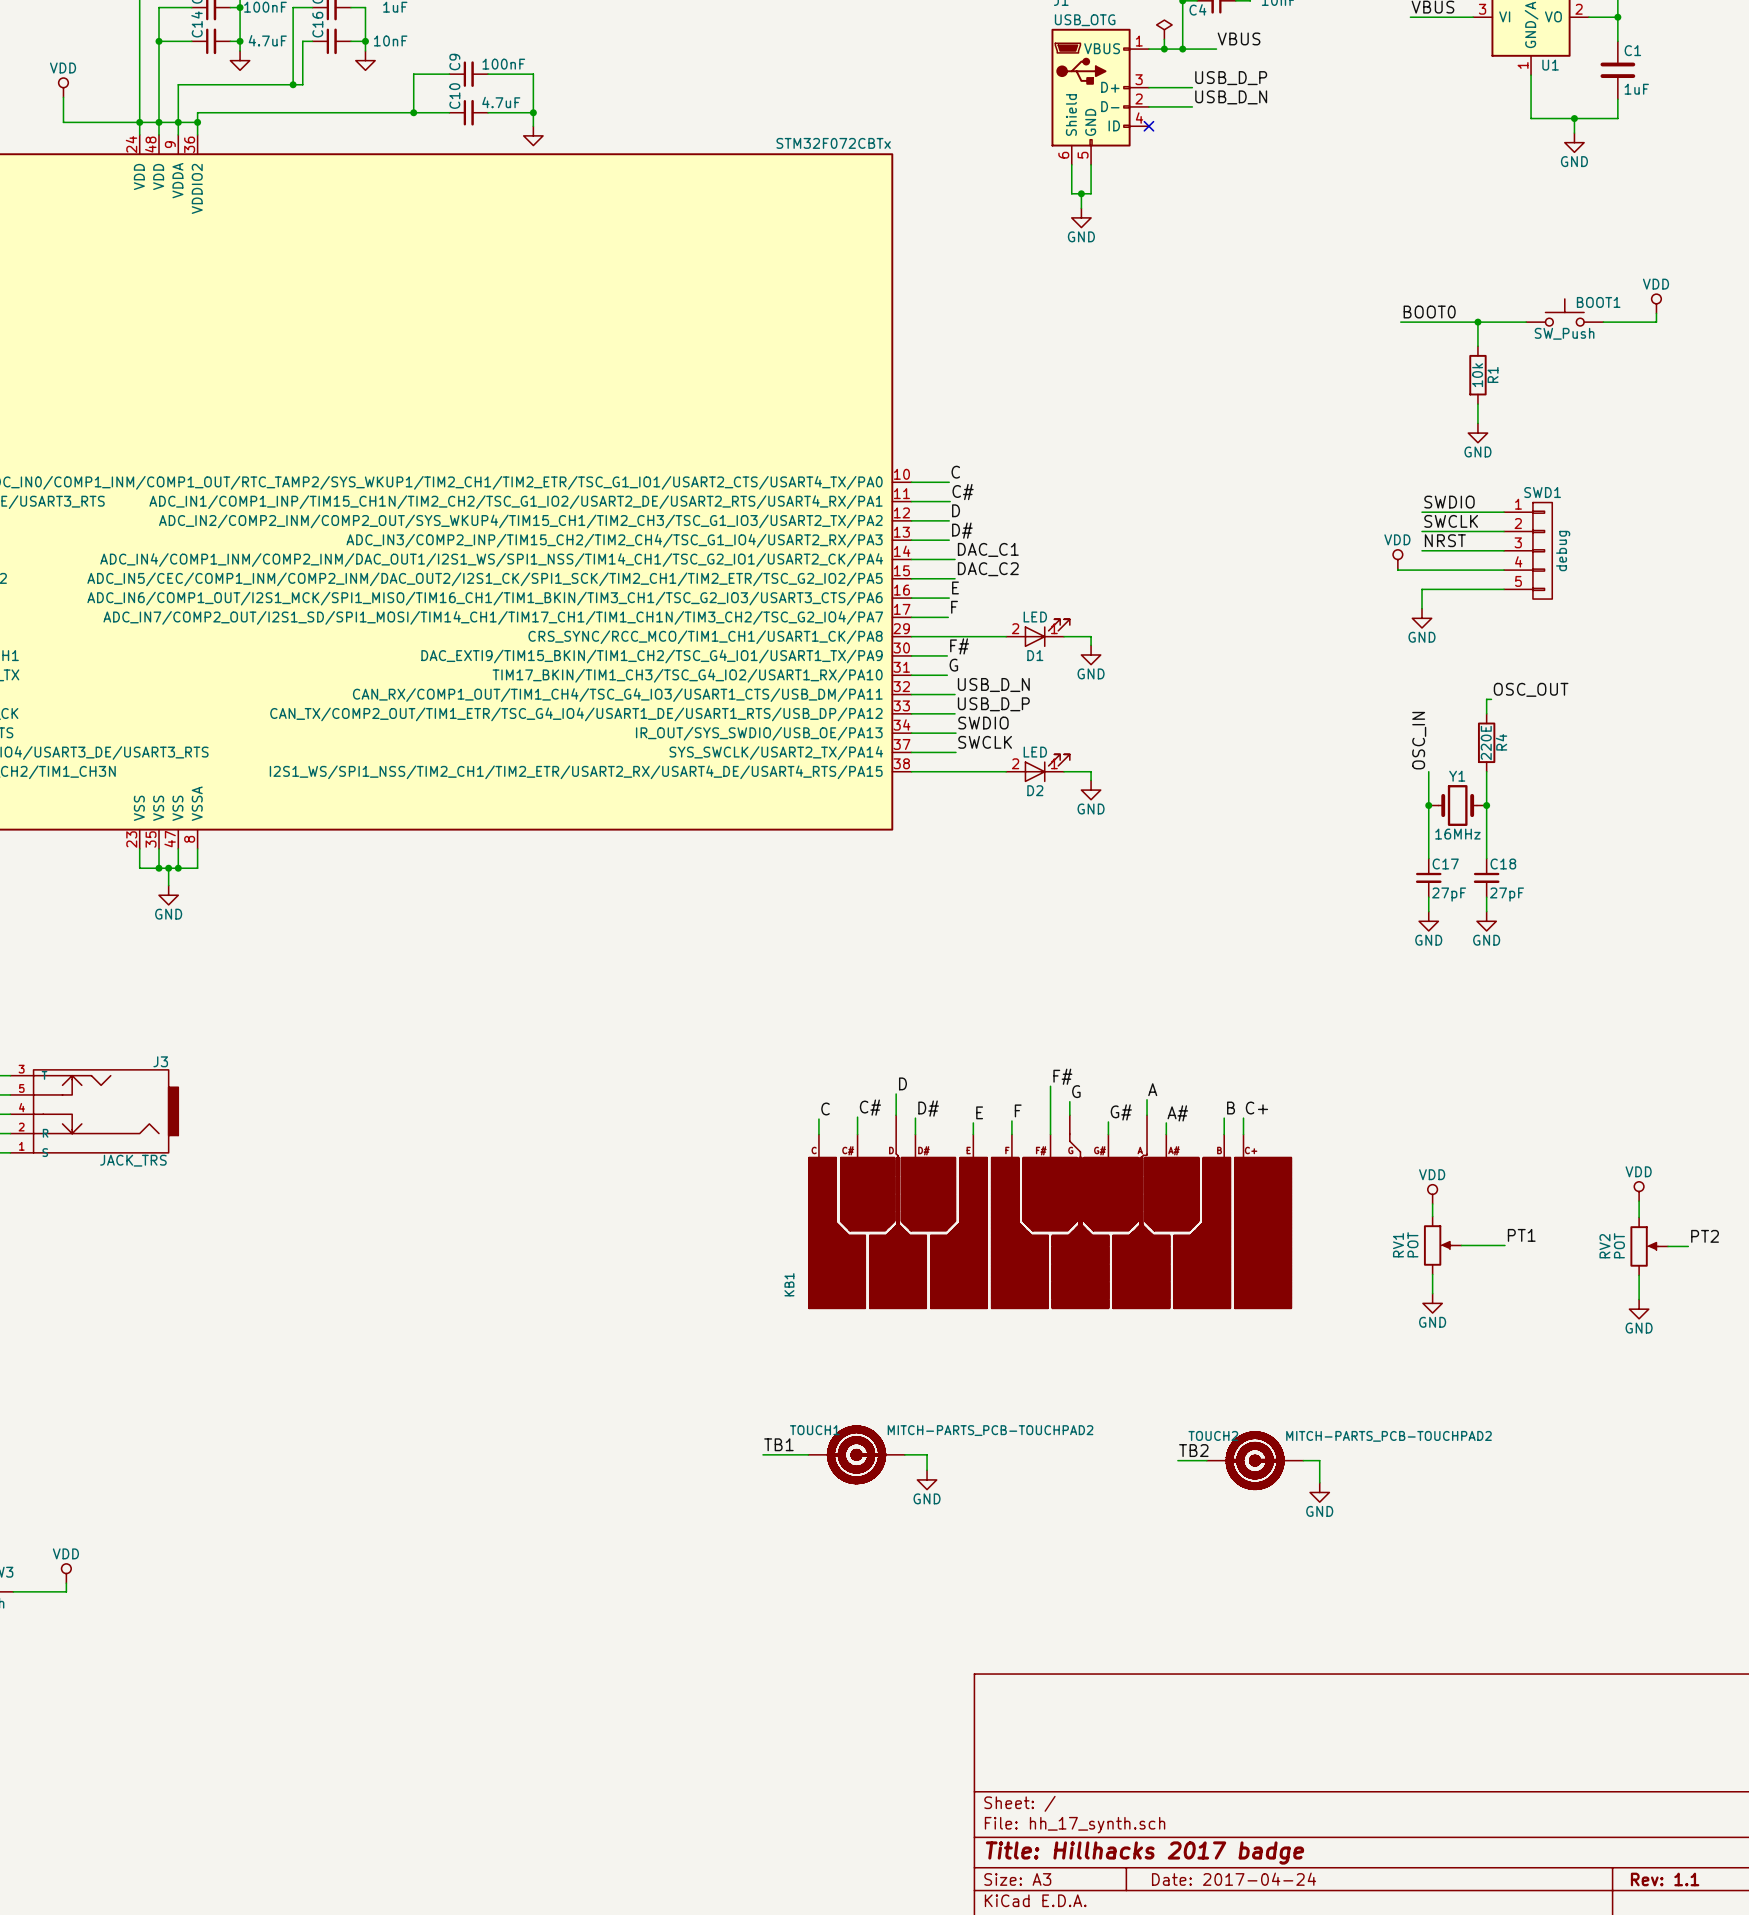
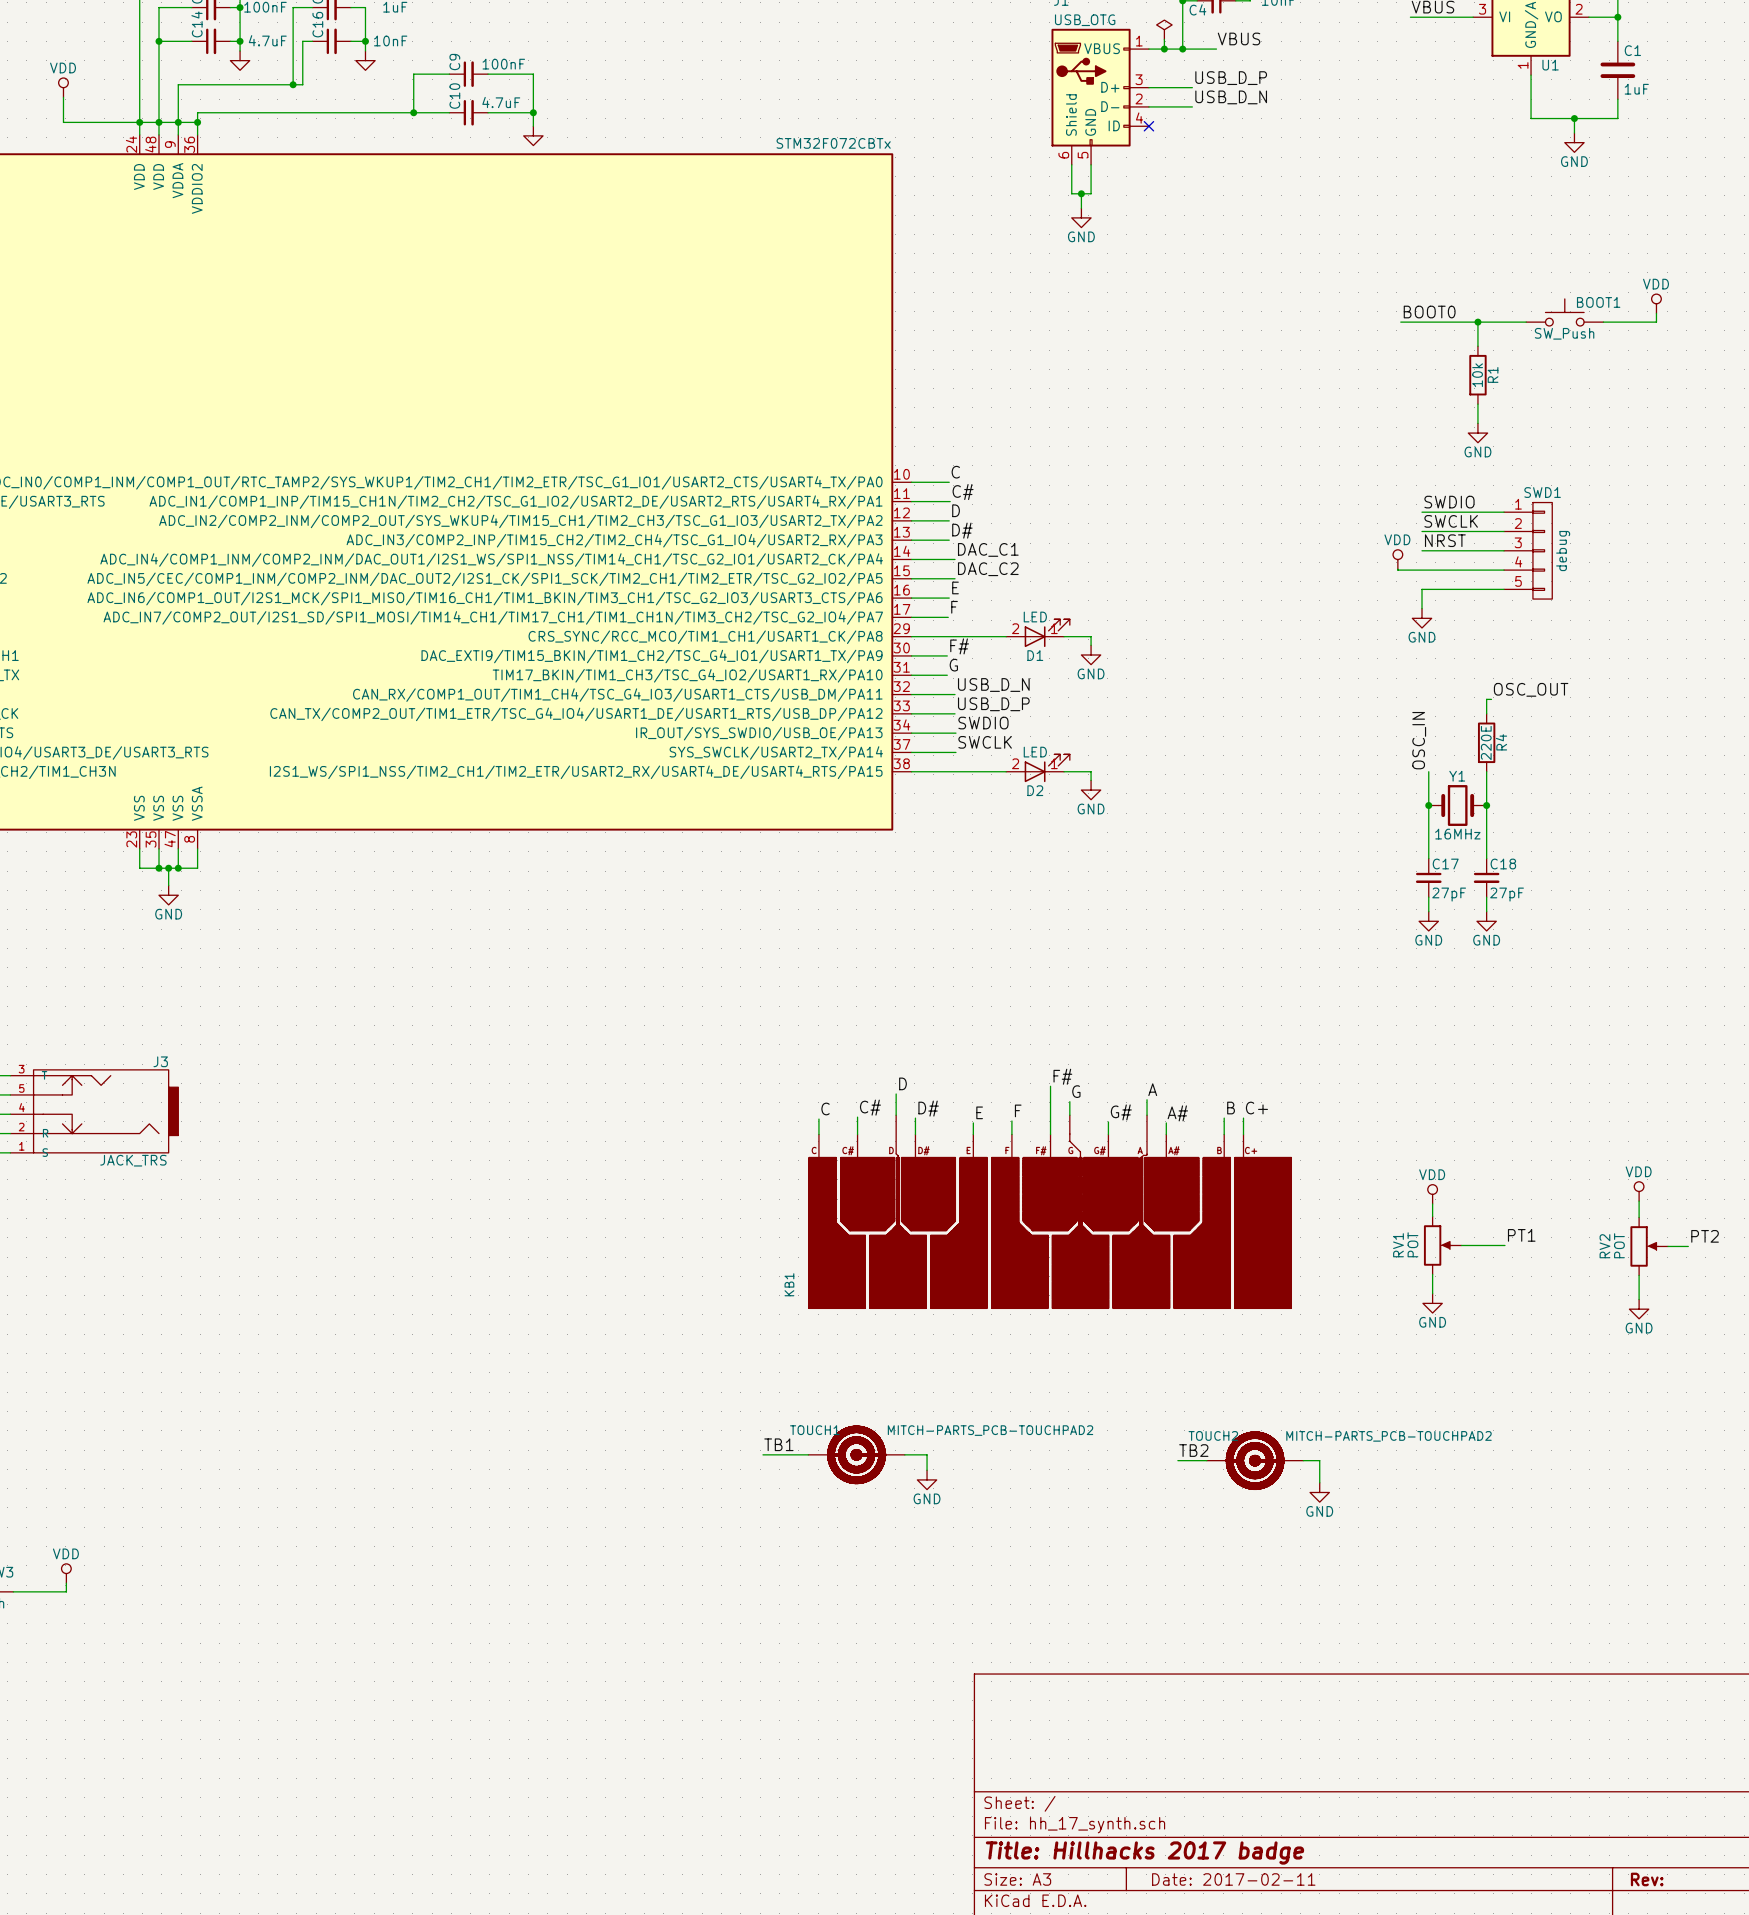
title block: Date: 2017-04-24 (1234, 1879) -> Date: 2017-02-11 (1233, 1879)
title block: Rev: 1.1 (1665, 1879) -> Rev: (1647, 1879)

